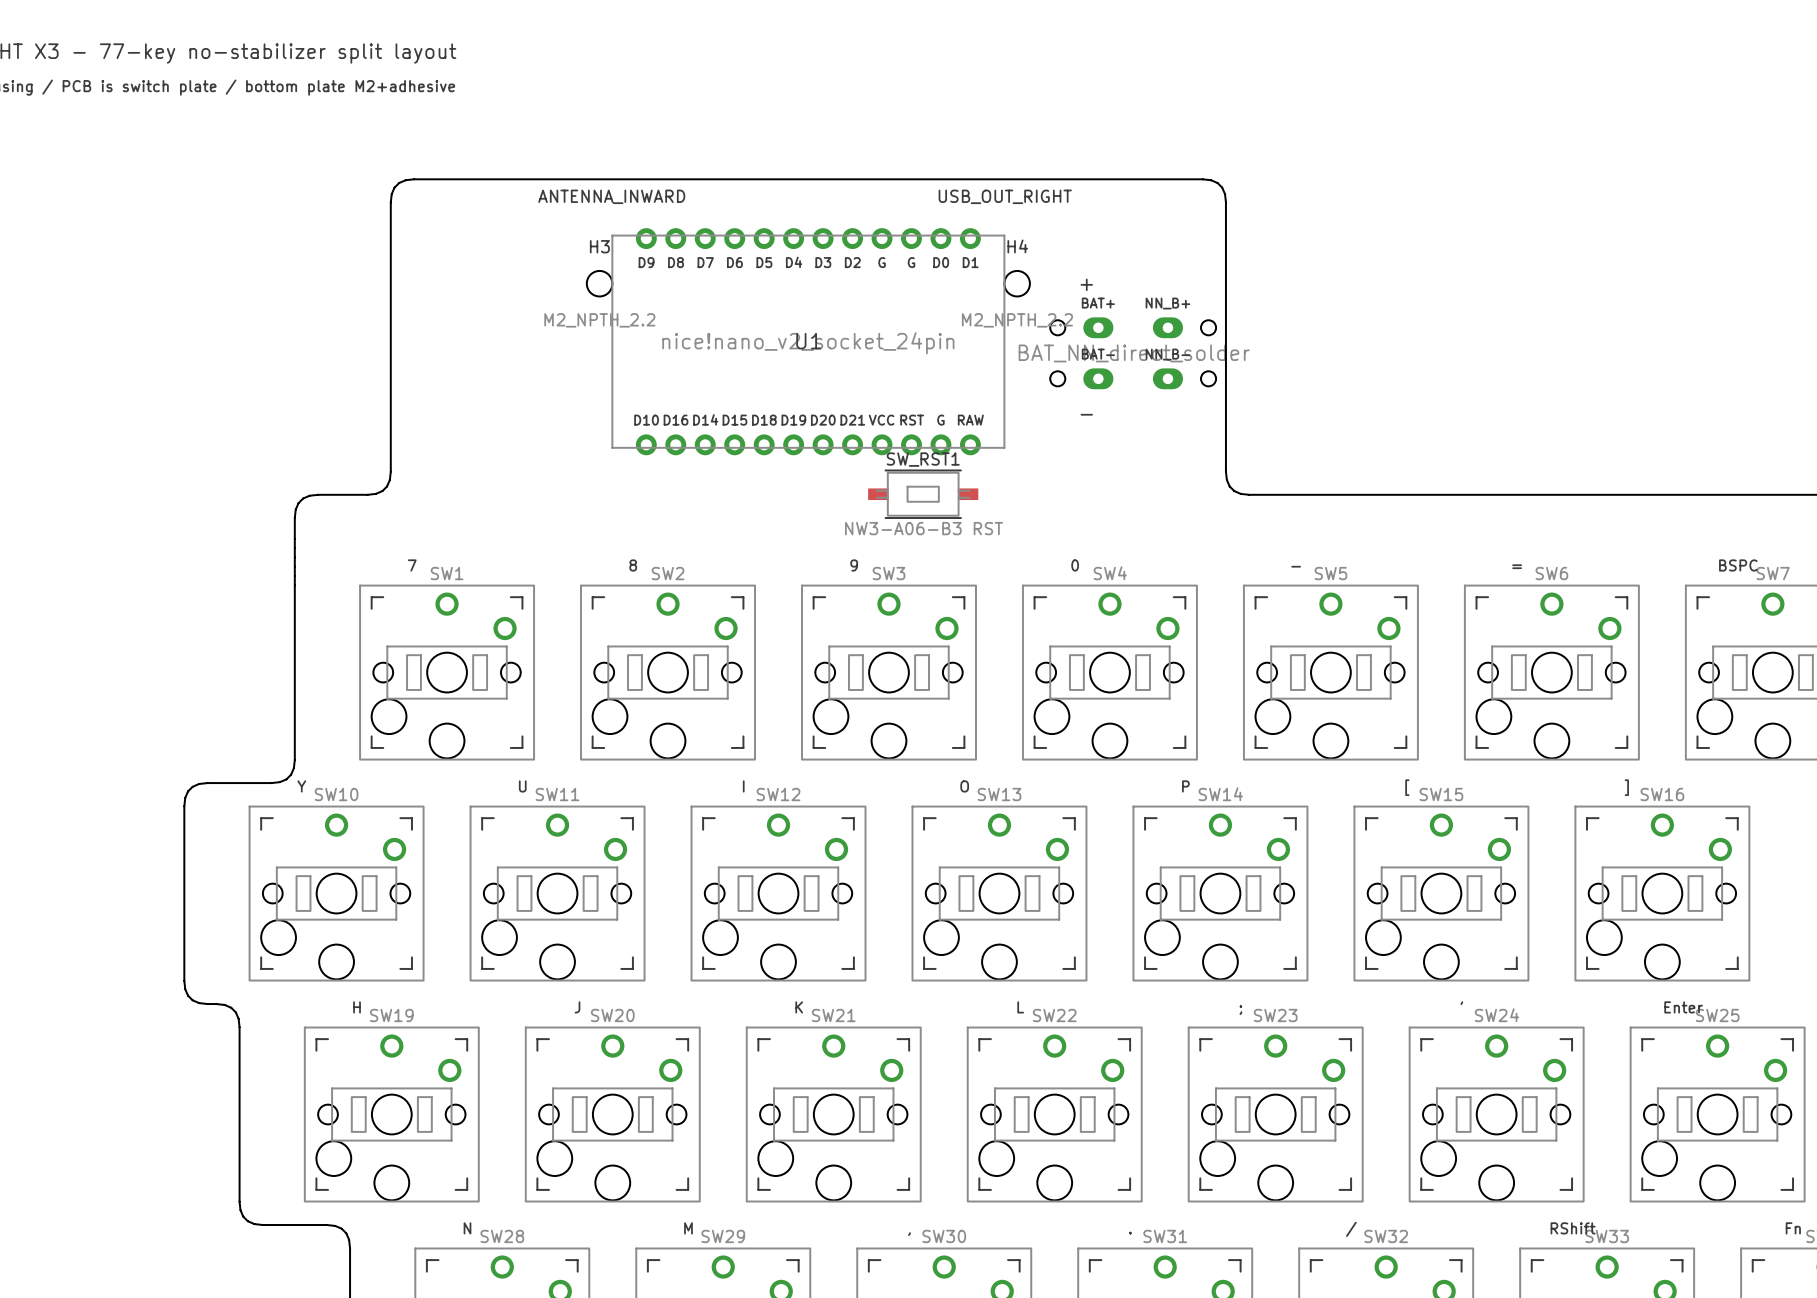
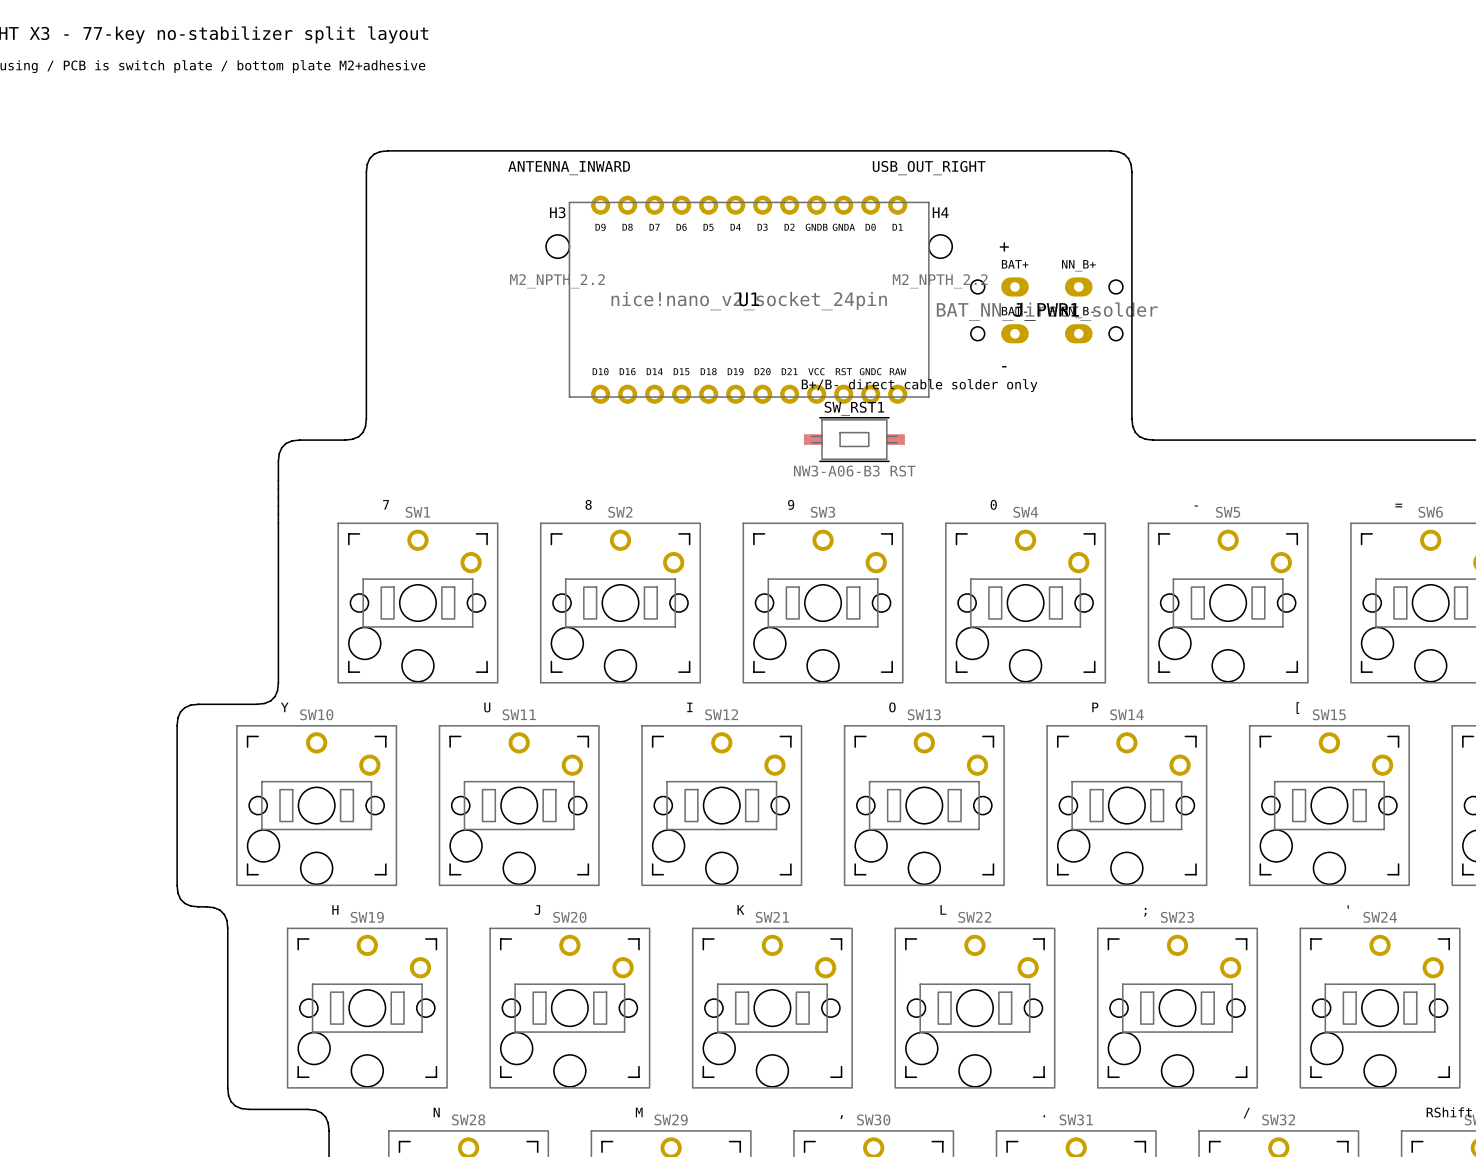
U1 footprint: [635, 228, 981, 456] -> [591, 195, 908, 404]
J_PWR1 name: none -> J_PWR1 (1046, 312)
text: none -> B+/B- direct cable solder only (919, 385)

